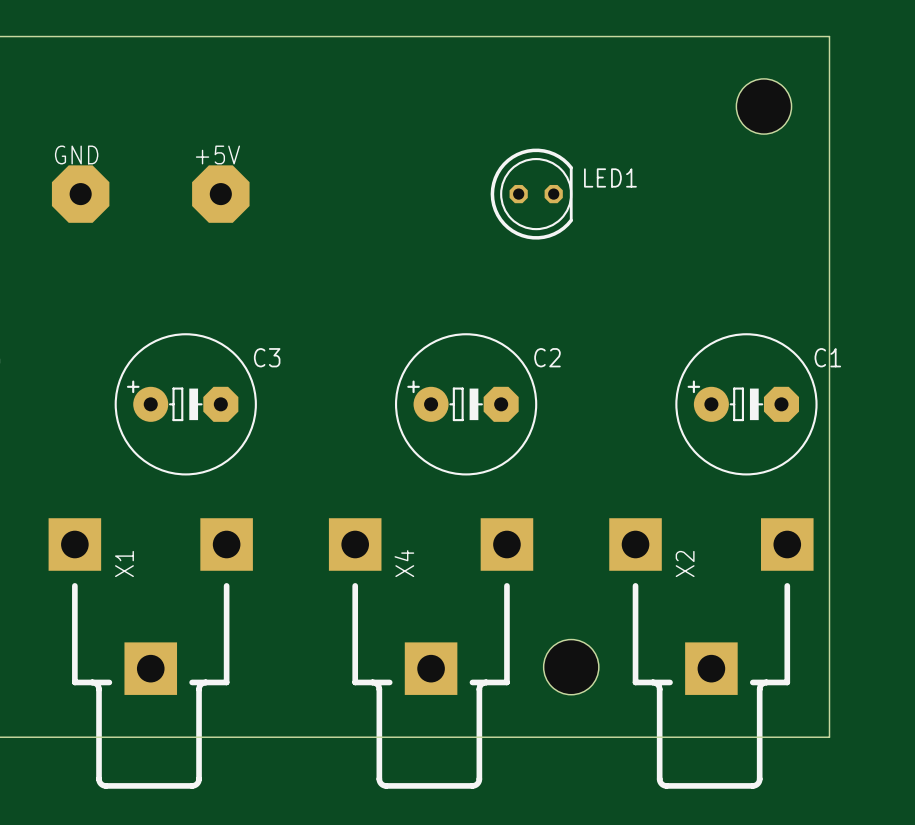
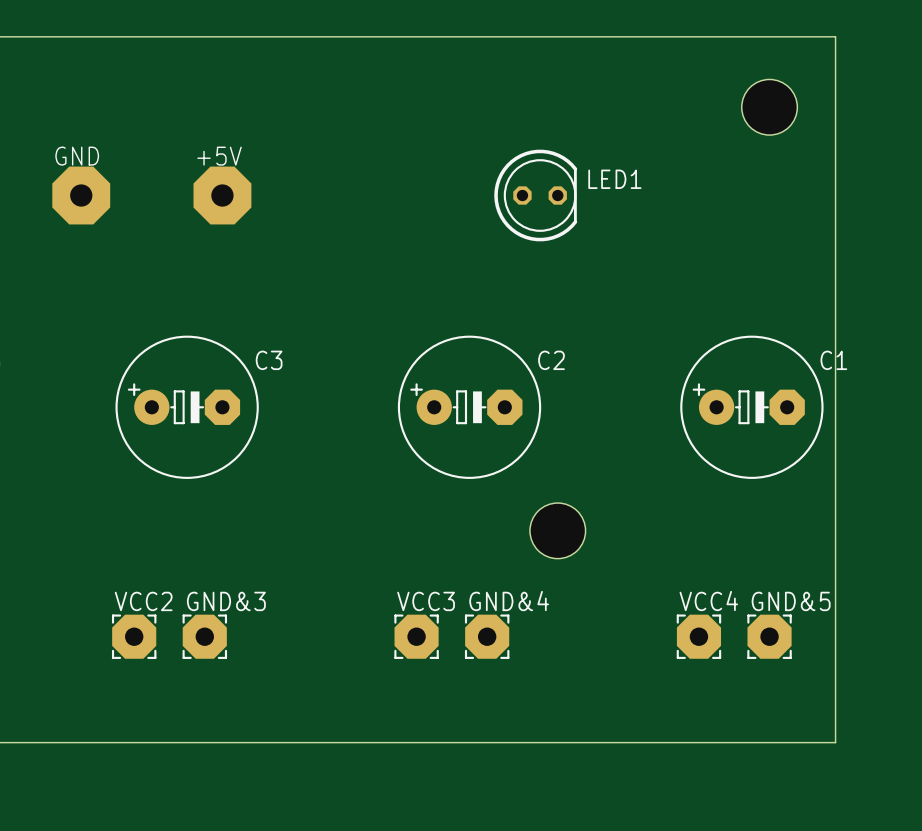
VCC2: none -> (134, 636)
GND&3: none -> (204, 636)
VCC3: none -> (416, 636)
GND&4: none -> (487, 636)
VCC4: none -> (698, 636)
GND&5: none -> (769, 636)
X1: (150, 653) -> none
X4: (431, 653) -> none
X2: (711, 653) -> none
hole position: (571, 667) -> (557, 530)

